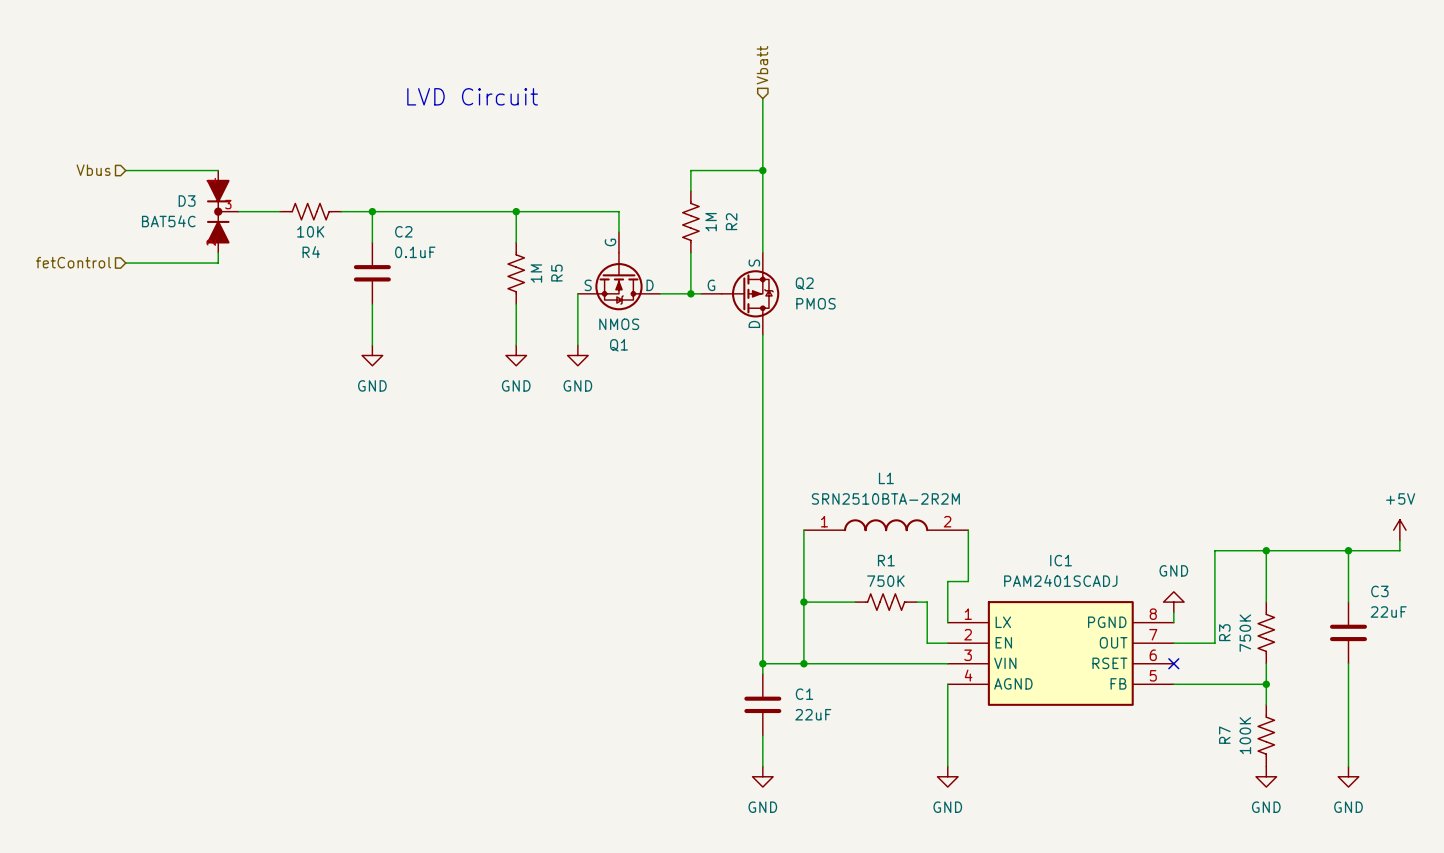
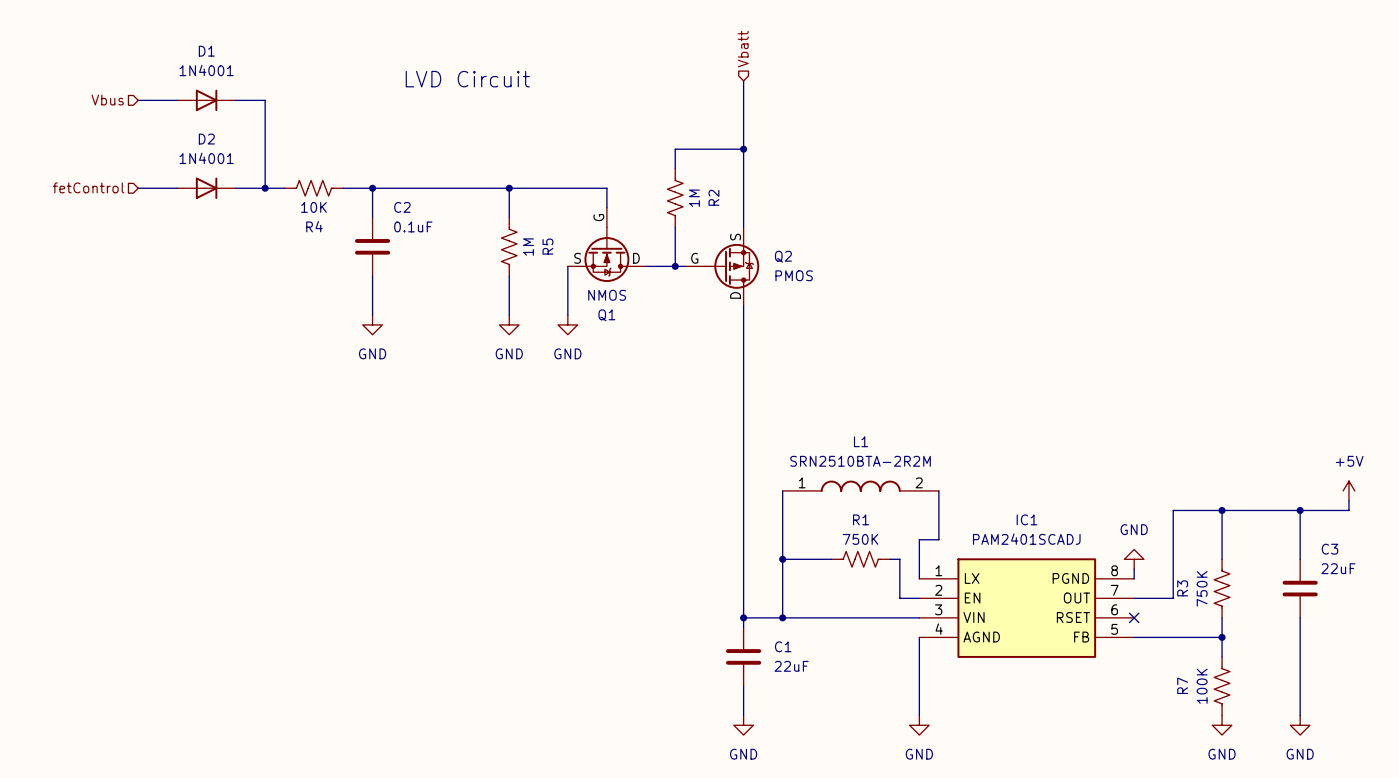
wire: none -> (138, 100) (177, 100)
D1: none -> 1N4001 (206, 100)
wire: none -> (235, 100) (265, 100) (265, 188)
hierarchical label position: Vbus (93, 170) -> Vbus (107, 100)
wire: (125, 170) (218, 170) -> none
wire: none -> (138, 188) (177, 188)
D2: none -> 1N4001 (206, 188)
D3: BAT54C (222, 211) -> none
junction: none -> (265, 188)
wire: (218, 252) (218, 263) (125, 263) -> none
hierarchical label position: fetControl (73, 262) -> fetControl (88, 187)

